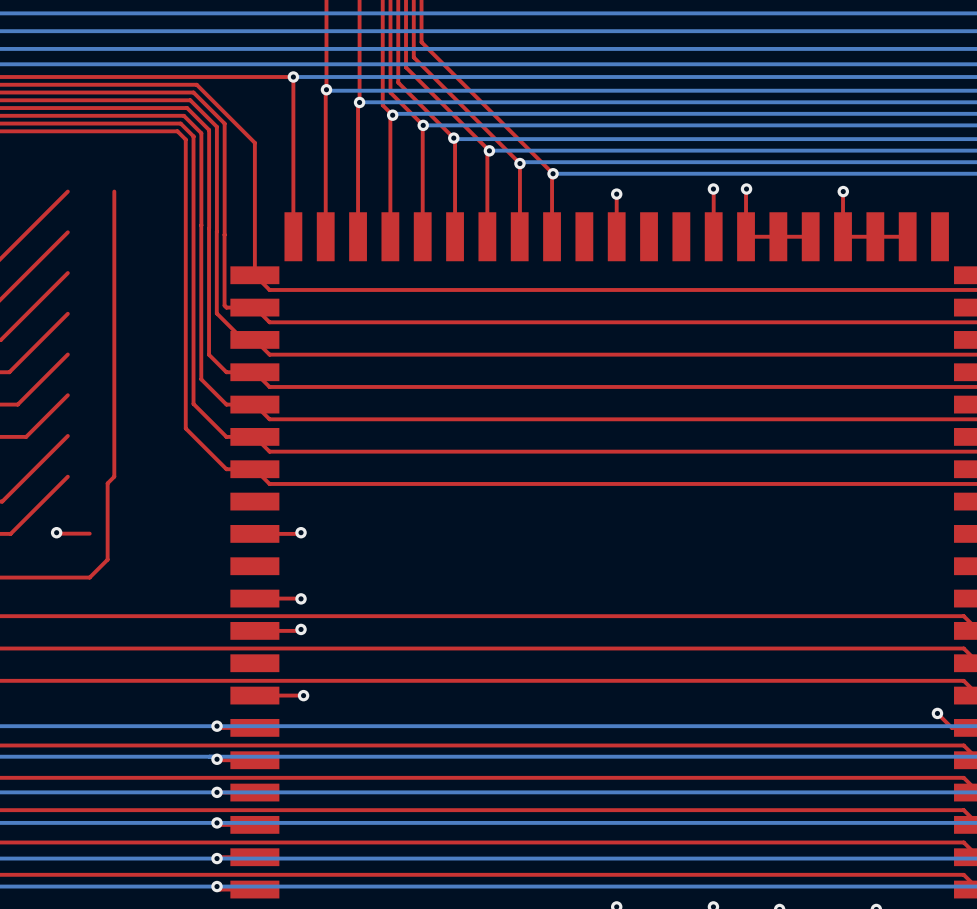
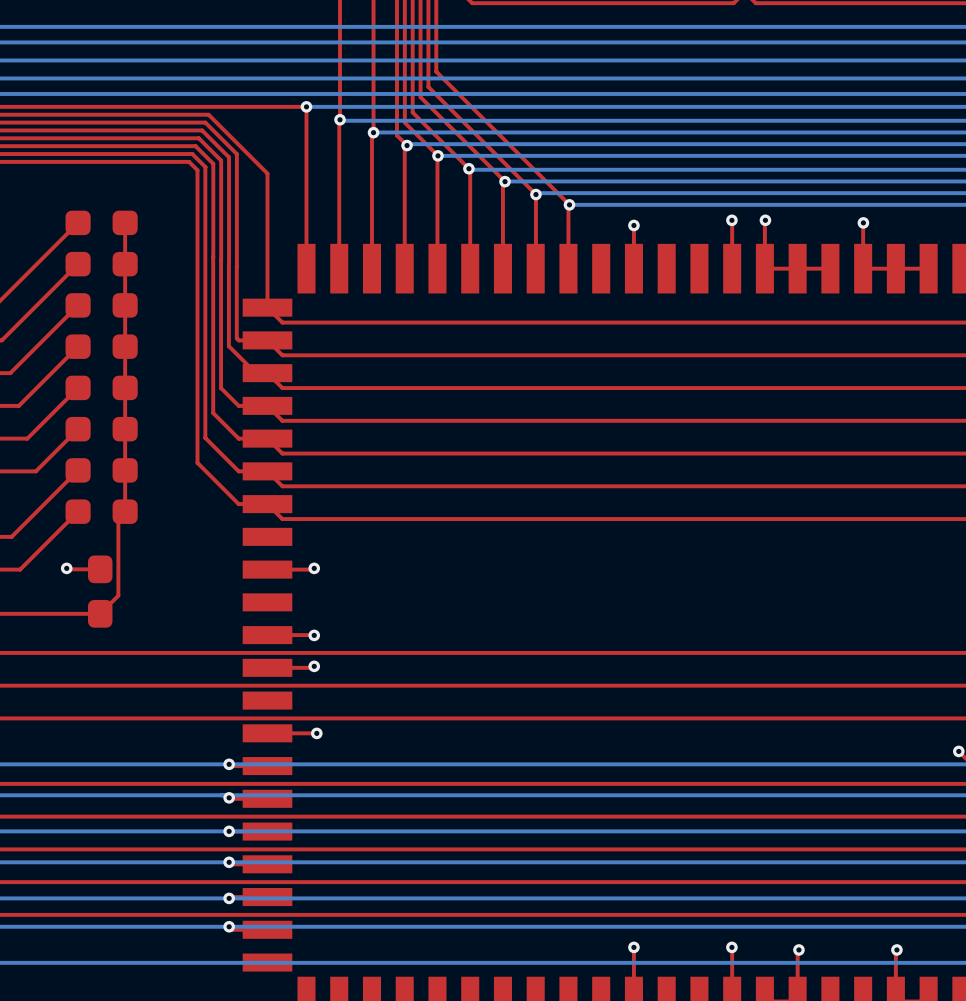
part: none -> (101, 222)
part: none -> (101, 264)
part: none -> (101, 305)
part: none -> (101, 346)
part: none -> (101, 387)
part: none -> (101, 429)
part: none -> (101, 470)
part: none -> (101, 511)
part: none -> (100, 591)

